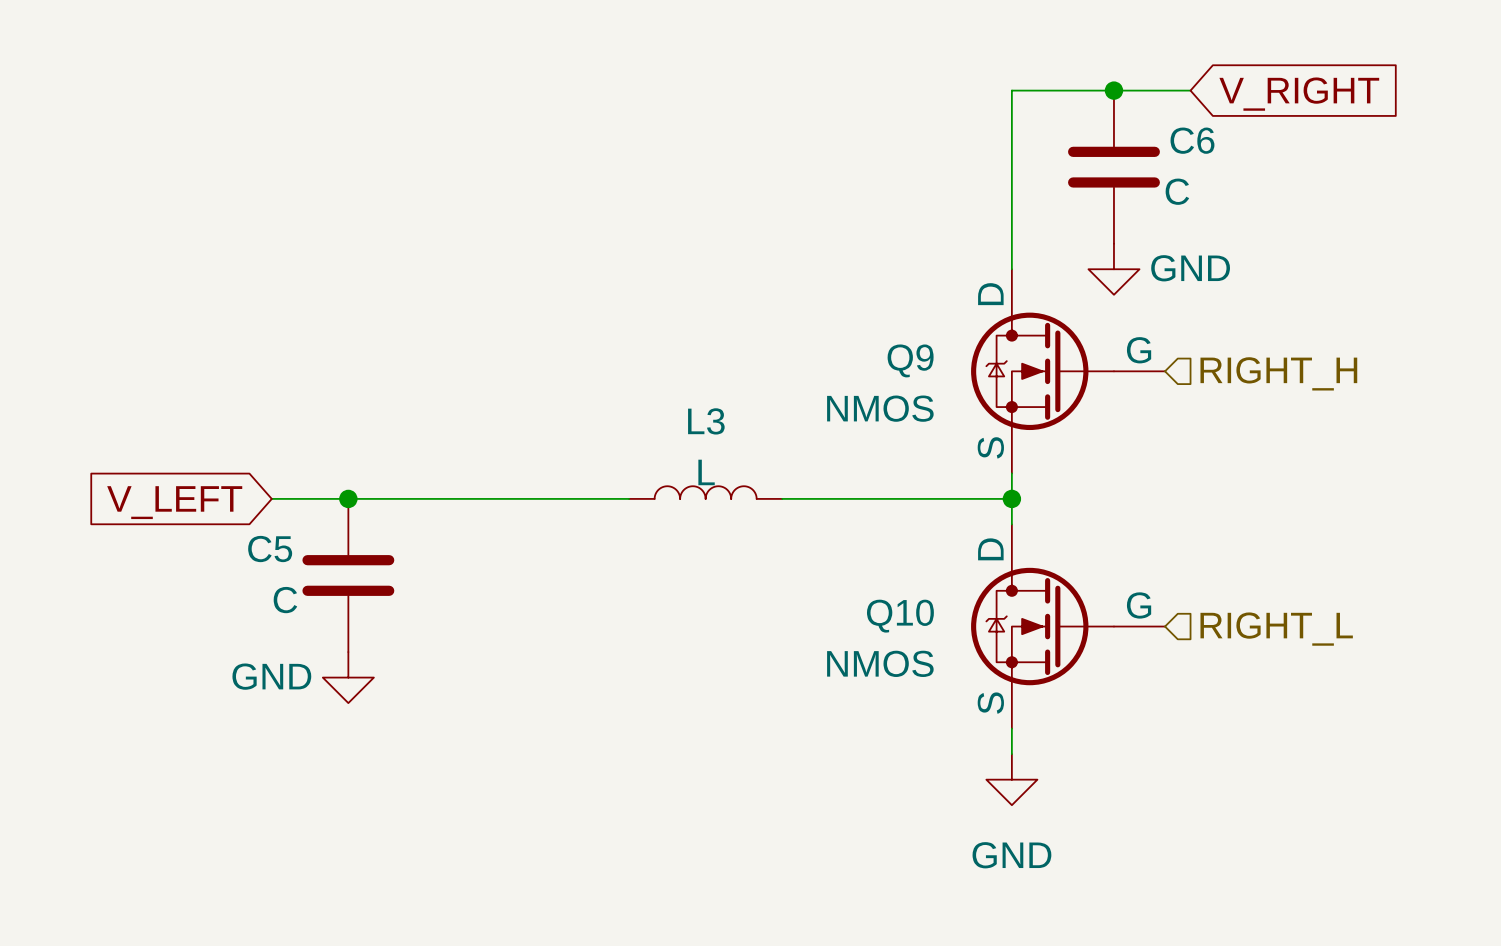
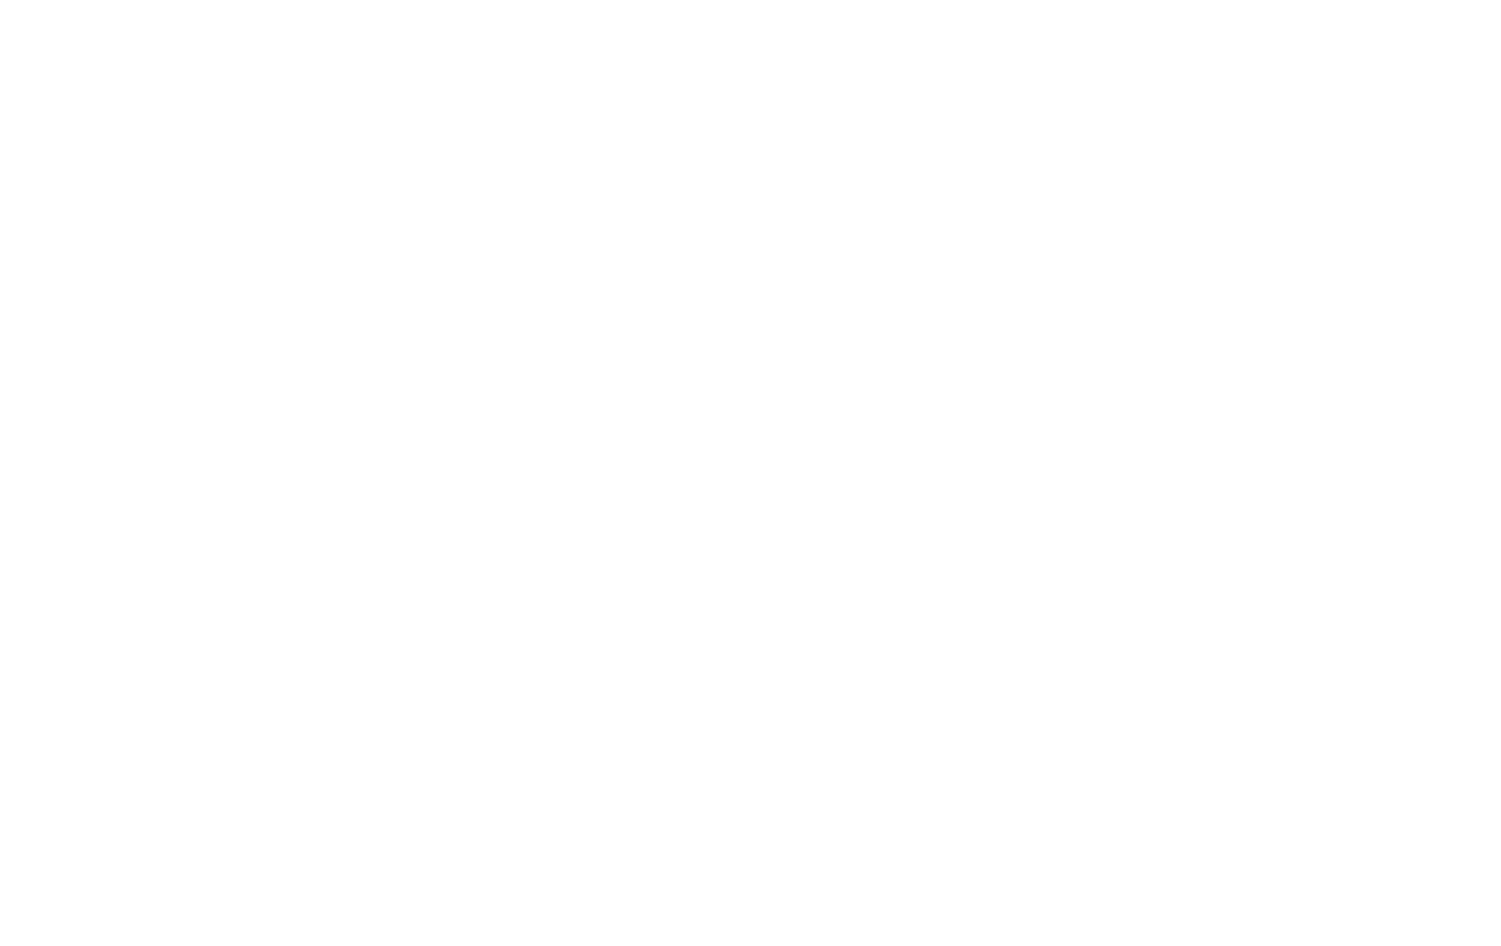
junction: (1113, 90) -> none
wire: (1190, 90) (1011, 90) (1011, 269) -> none
global label: V_RIGHT (1299, 94) -> none
C6: C (1113, 167) -> none
power symbol: GND (1113, 269) -> none
Q9: NMOS (1068, 371) -> none
hierarchical label: RIGHT_H (1278, 373) -> none
wire: (1011, 473) (1011, 524) -> none
L3: L (705, 492) -> none
wire: (271, 498) (629, 498) -> none
junction: (348, 498) -> none
wire: (782, 498) (1011, 498) -> none
junction: (1011, 498) -> none
global label: V_LEFT (174, 502) -> none
C5: C (348, 575) -> none
Q10: NMOS (1068, 626) -> none
hierarchical label: RIGHT_L (1276, 629) -> none
power symbol: GND (348, 677) -> none
wire: (1011, 728) (1011, 754) -> none
power symbol: GND (1011, 779) -> none

